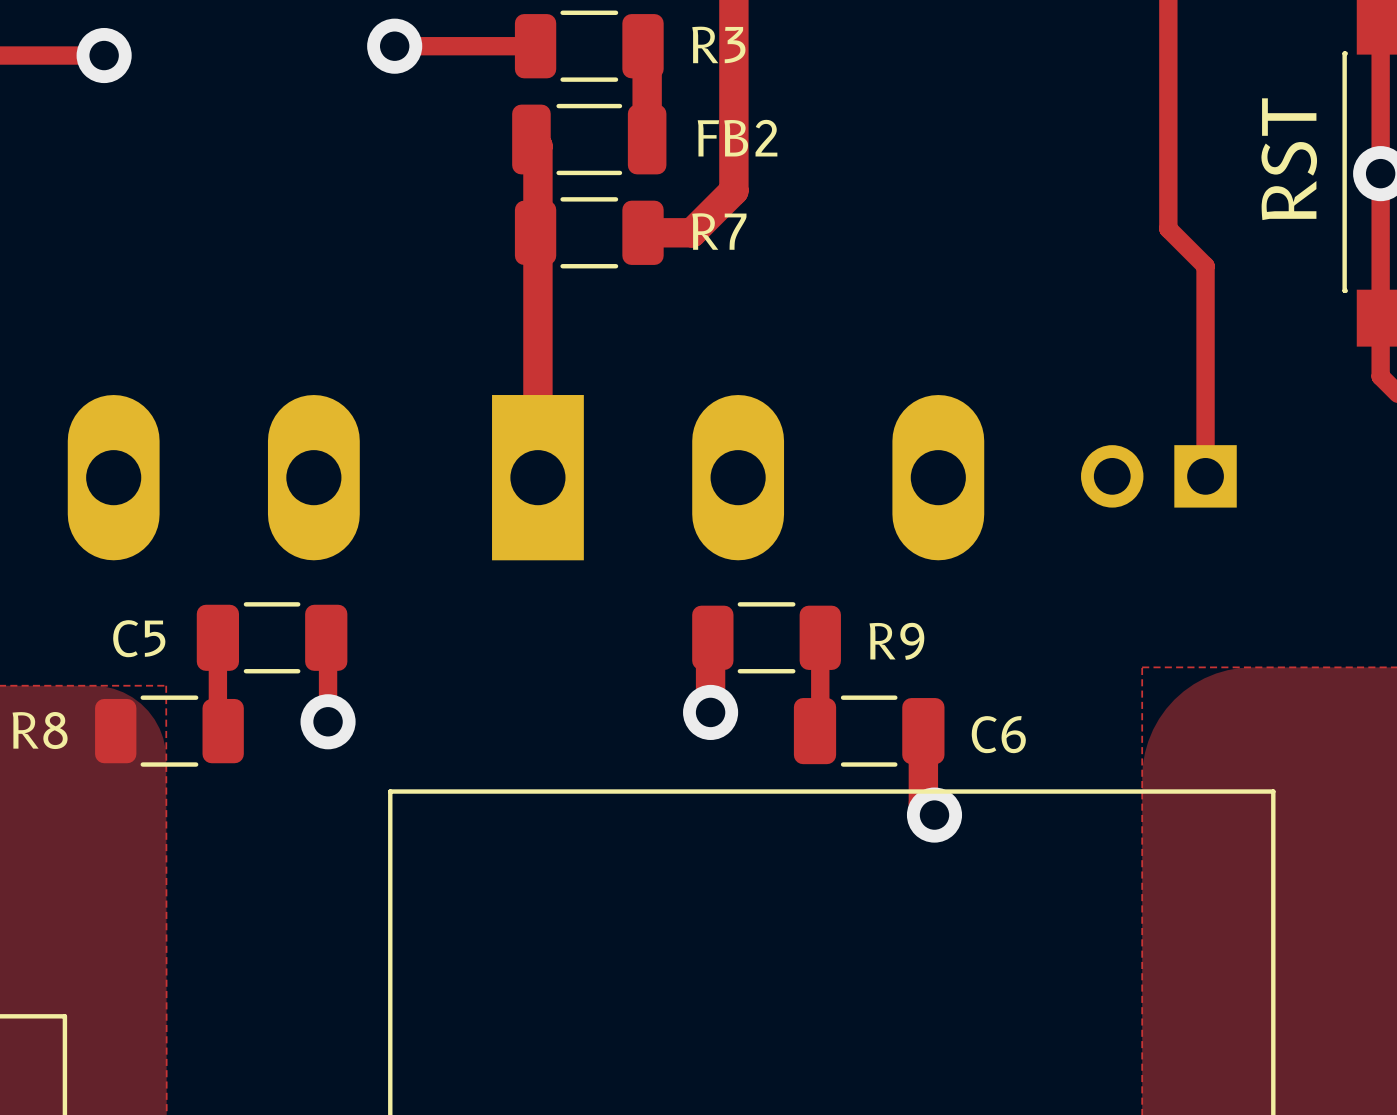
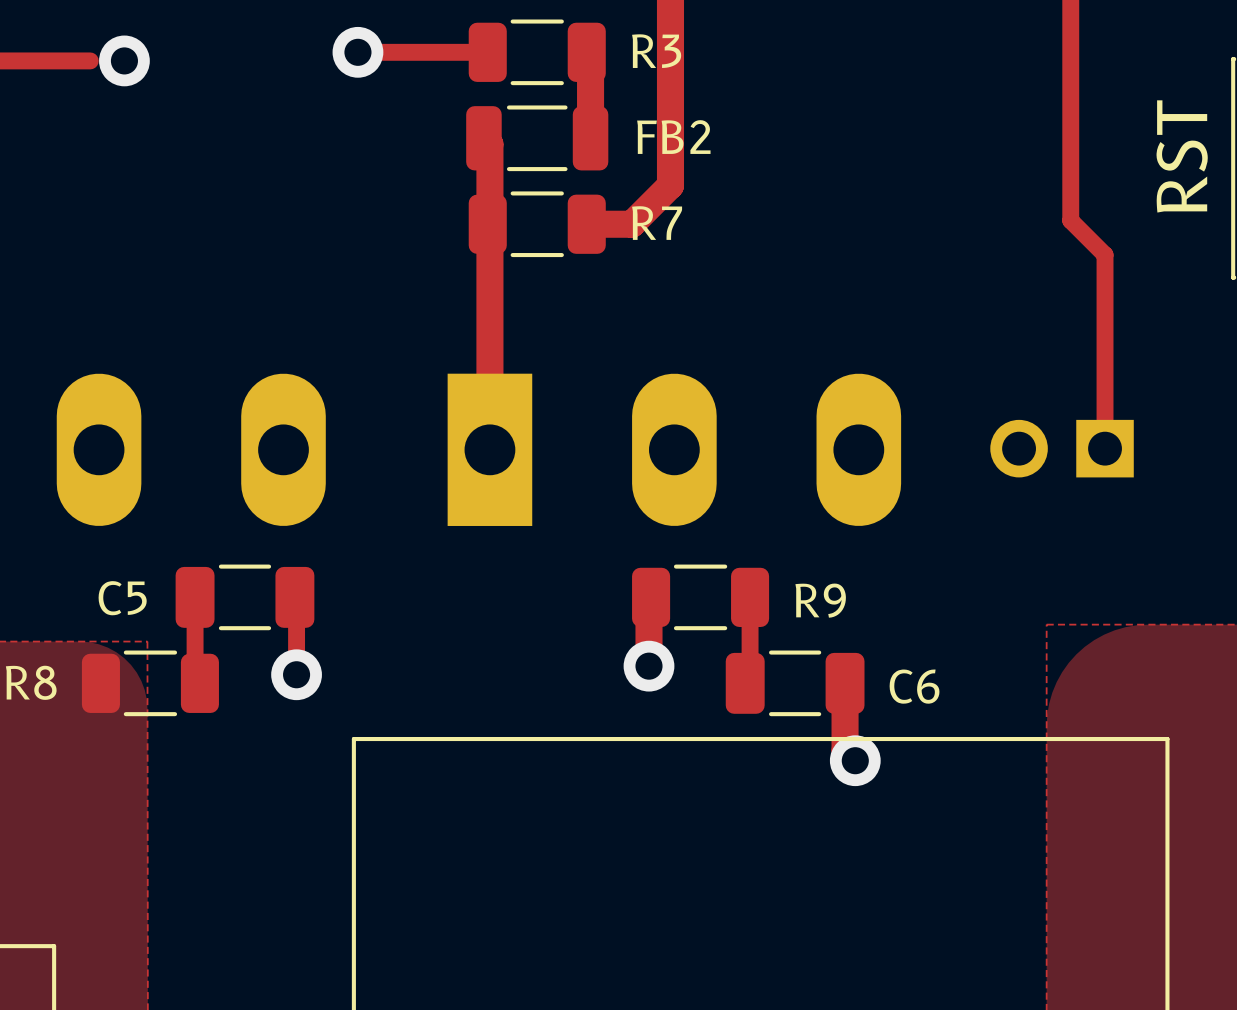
via position: (104, 55) -> (124, 60)

